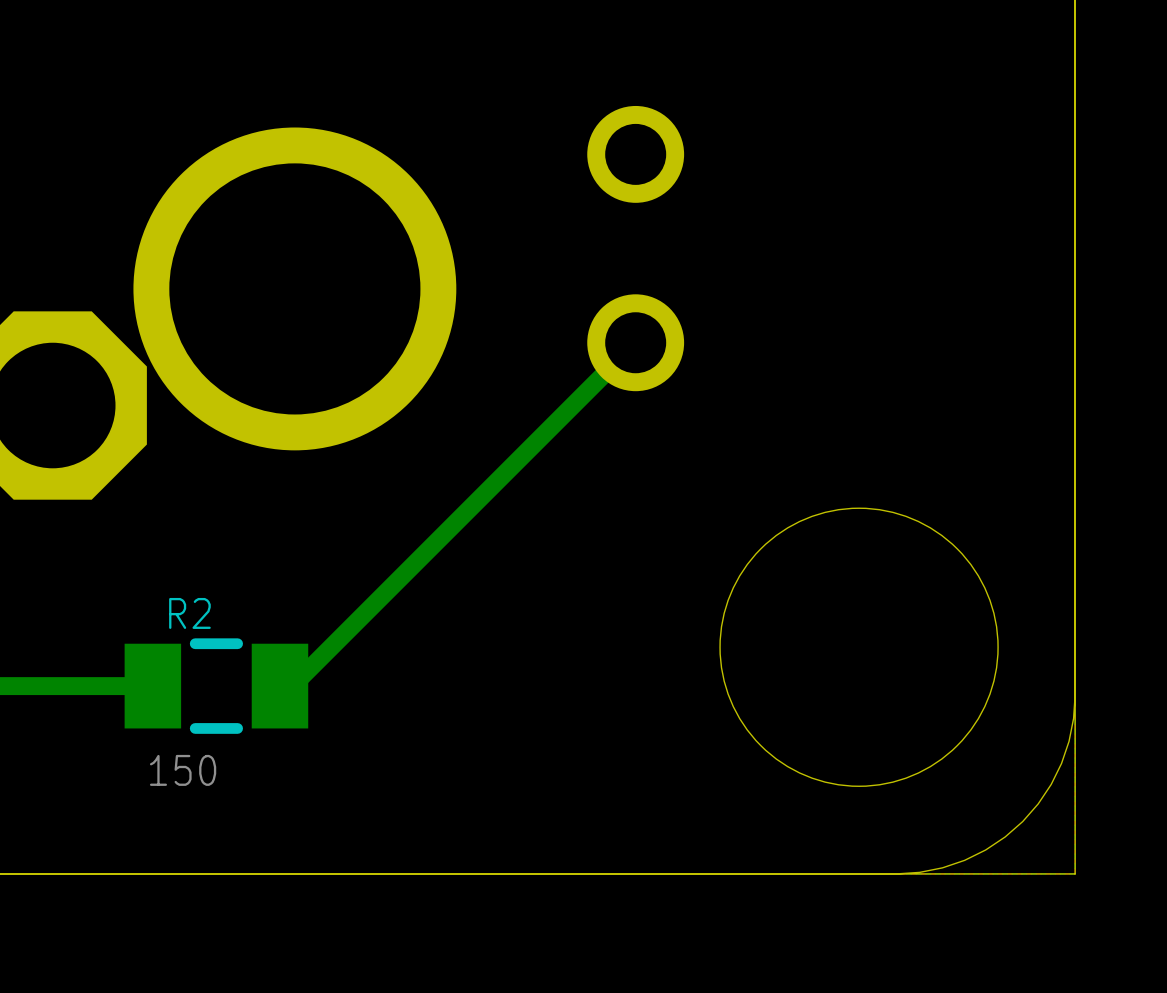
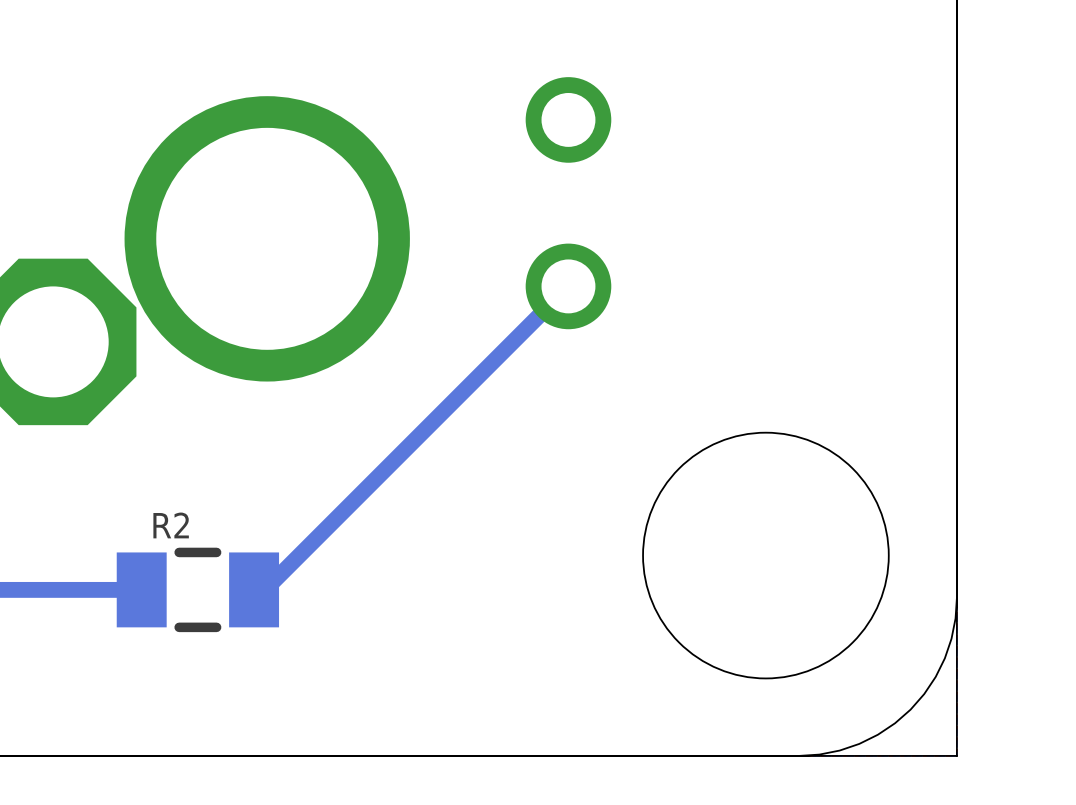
R2 value: 150 (183, 770) -> none

